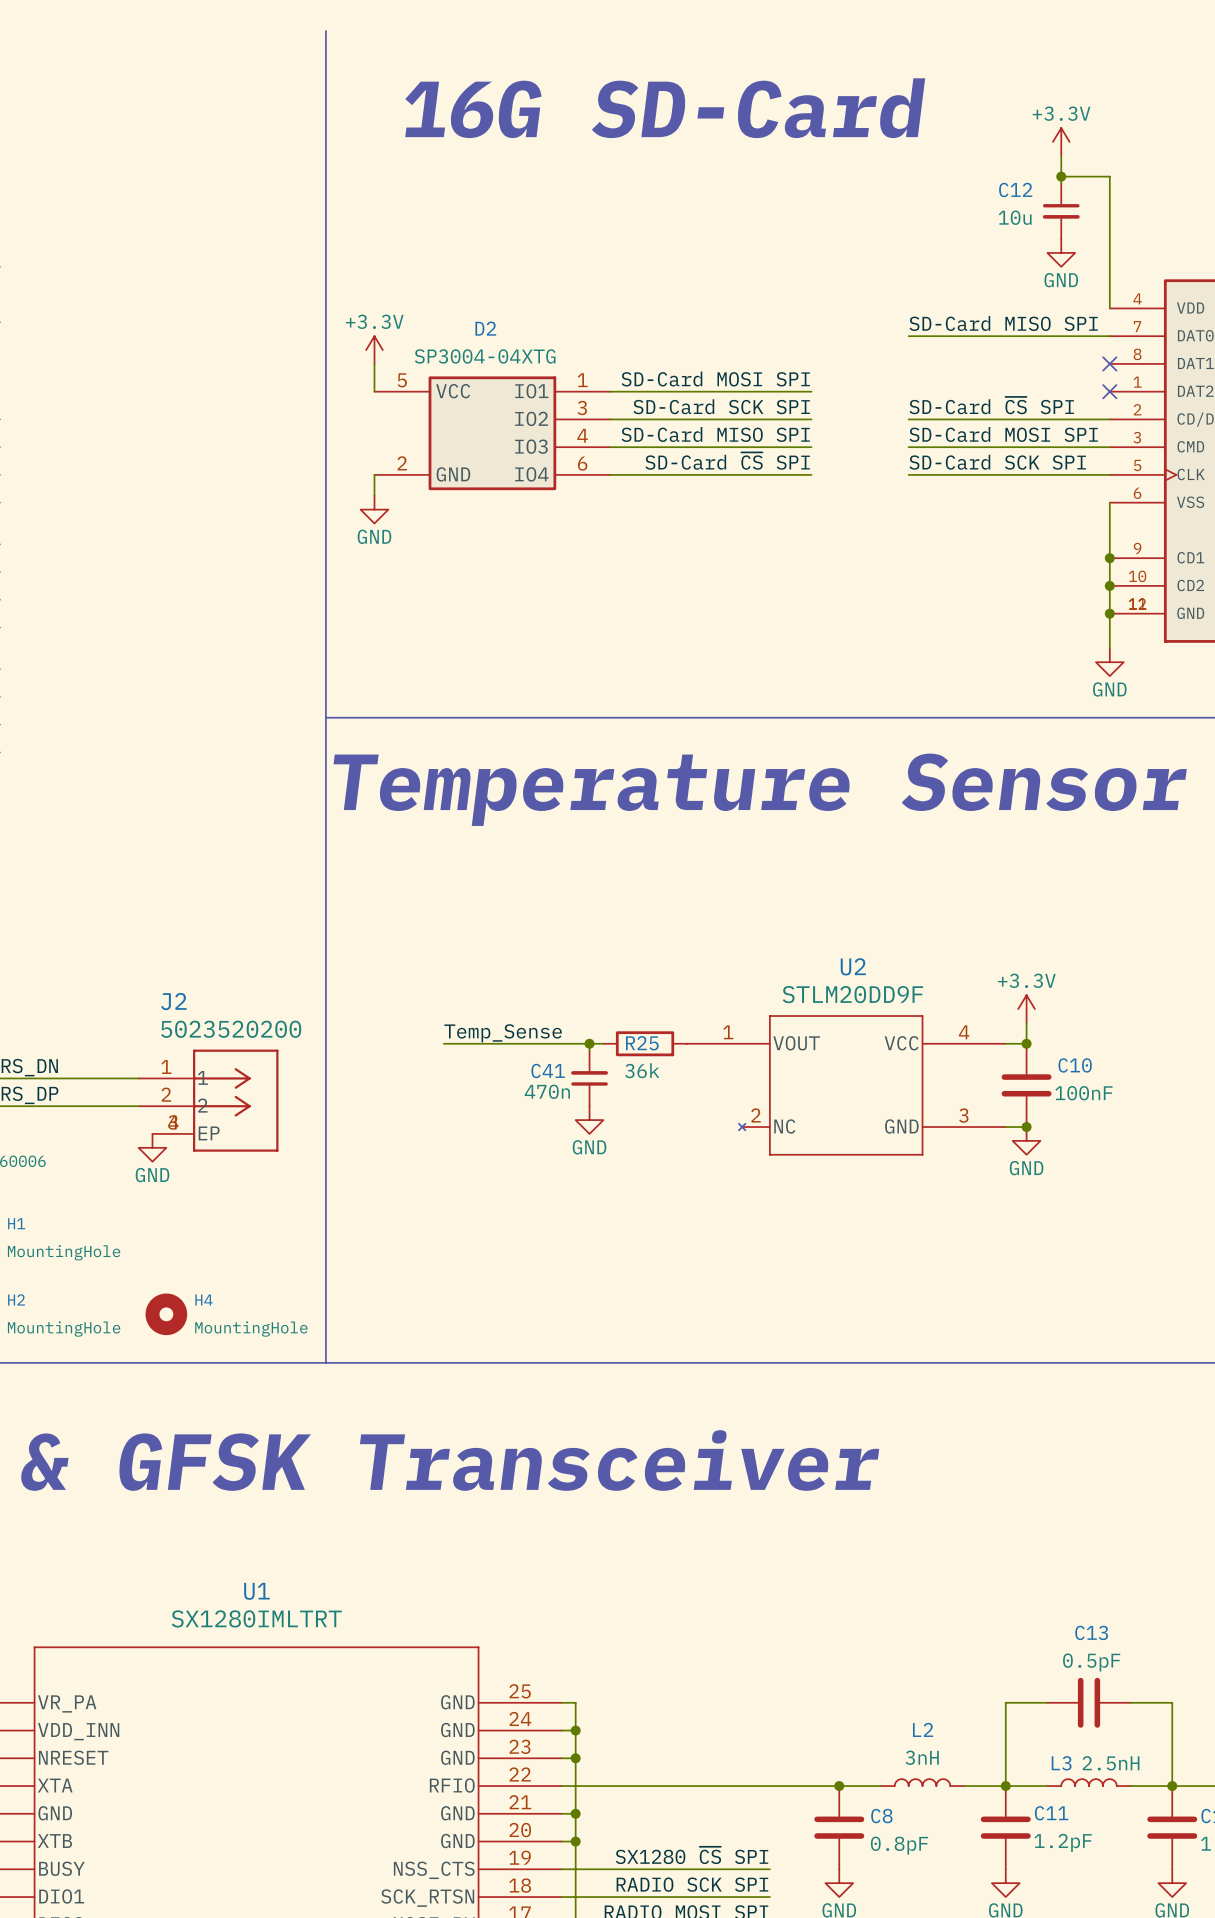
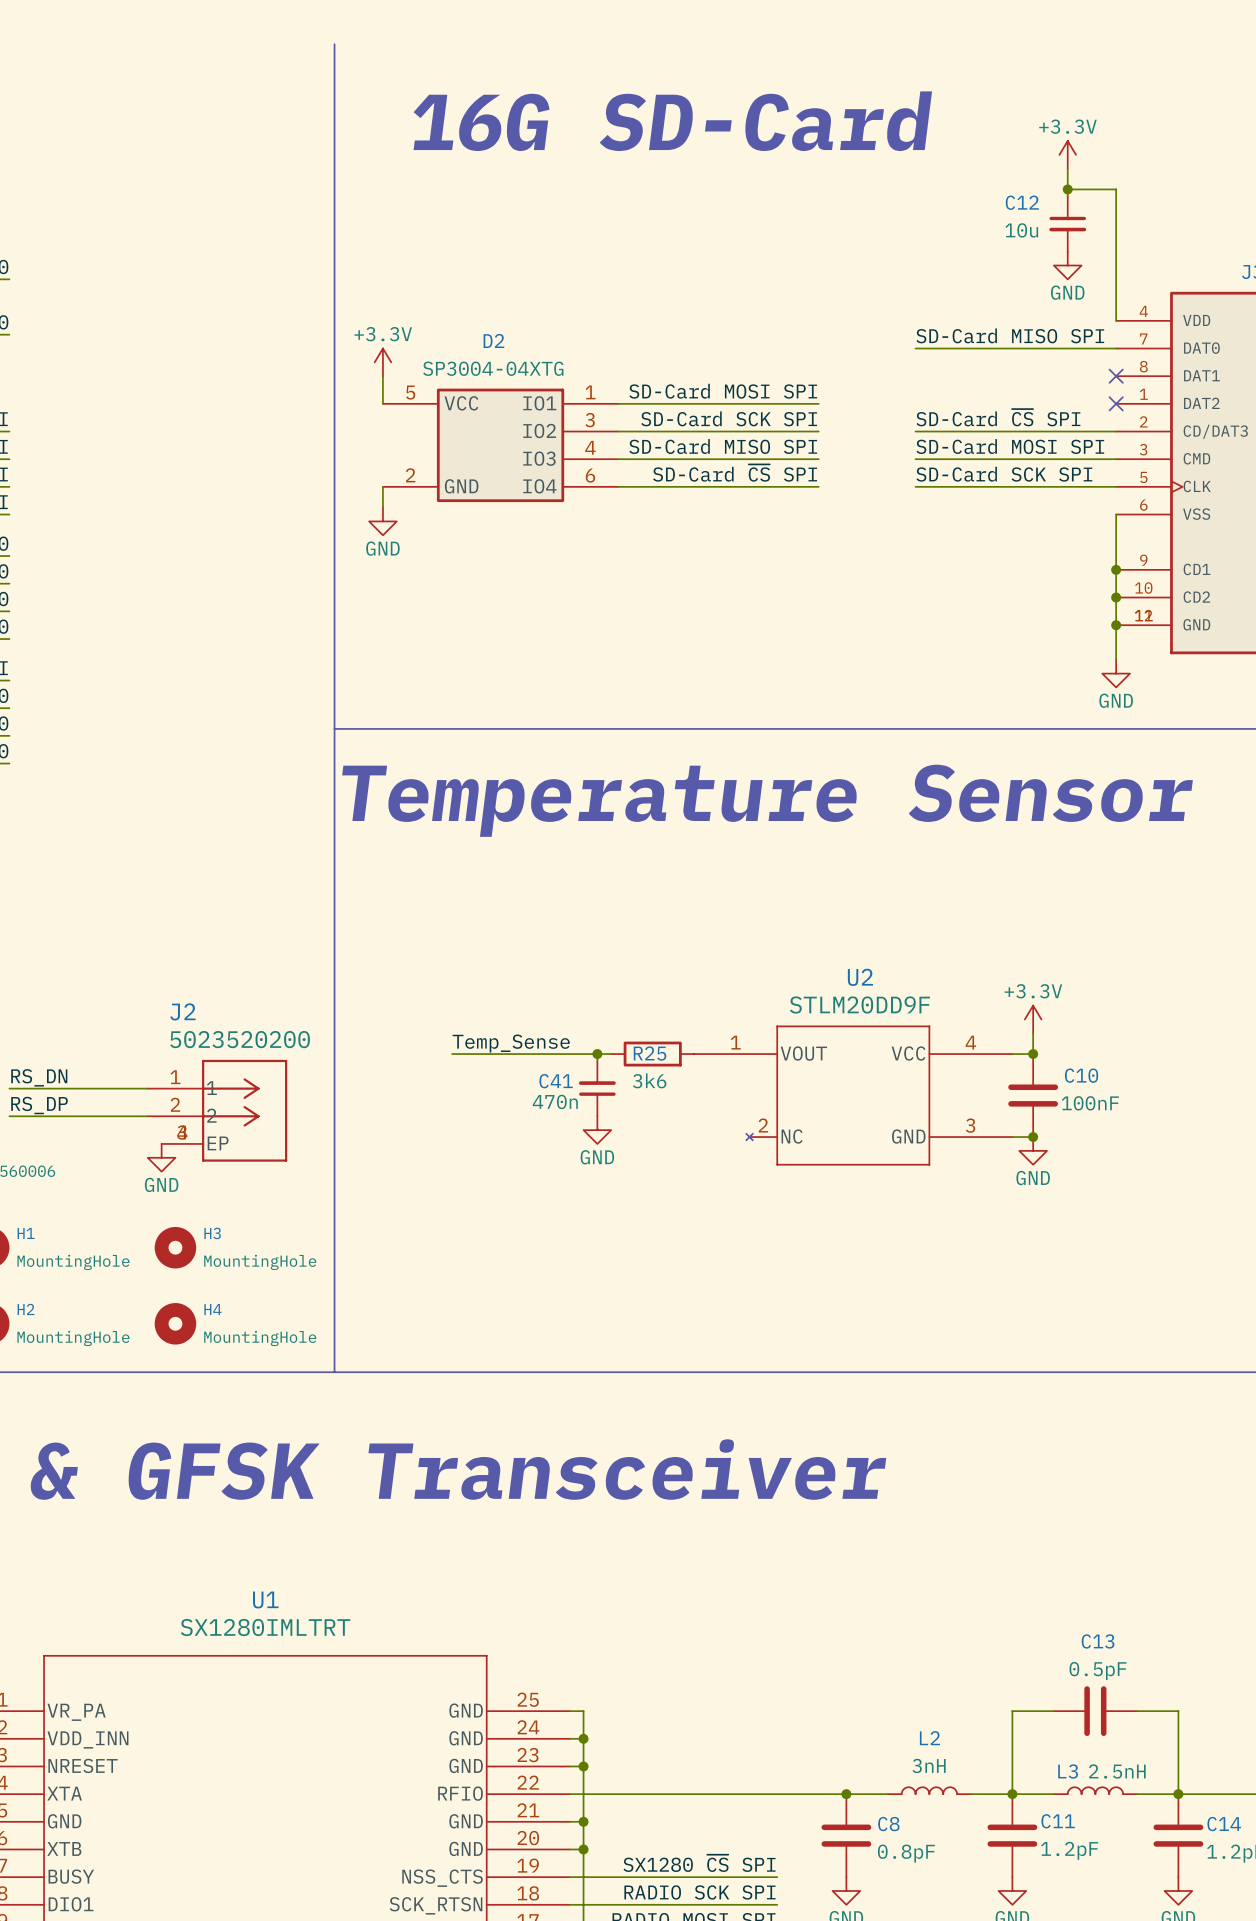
R25 value: 36k (642, 1070) -> 3k6 (649, 1080)
H3: none -> MountingHole (175, 1247)

